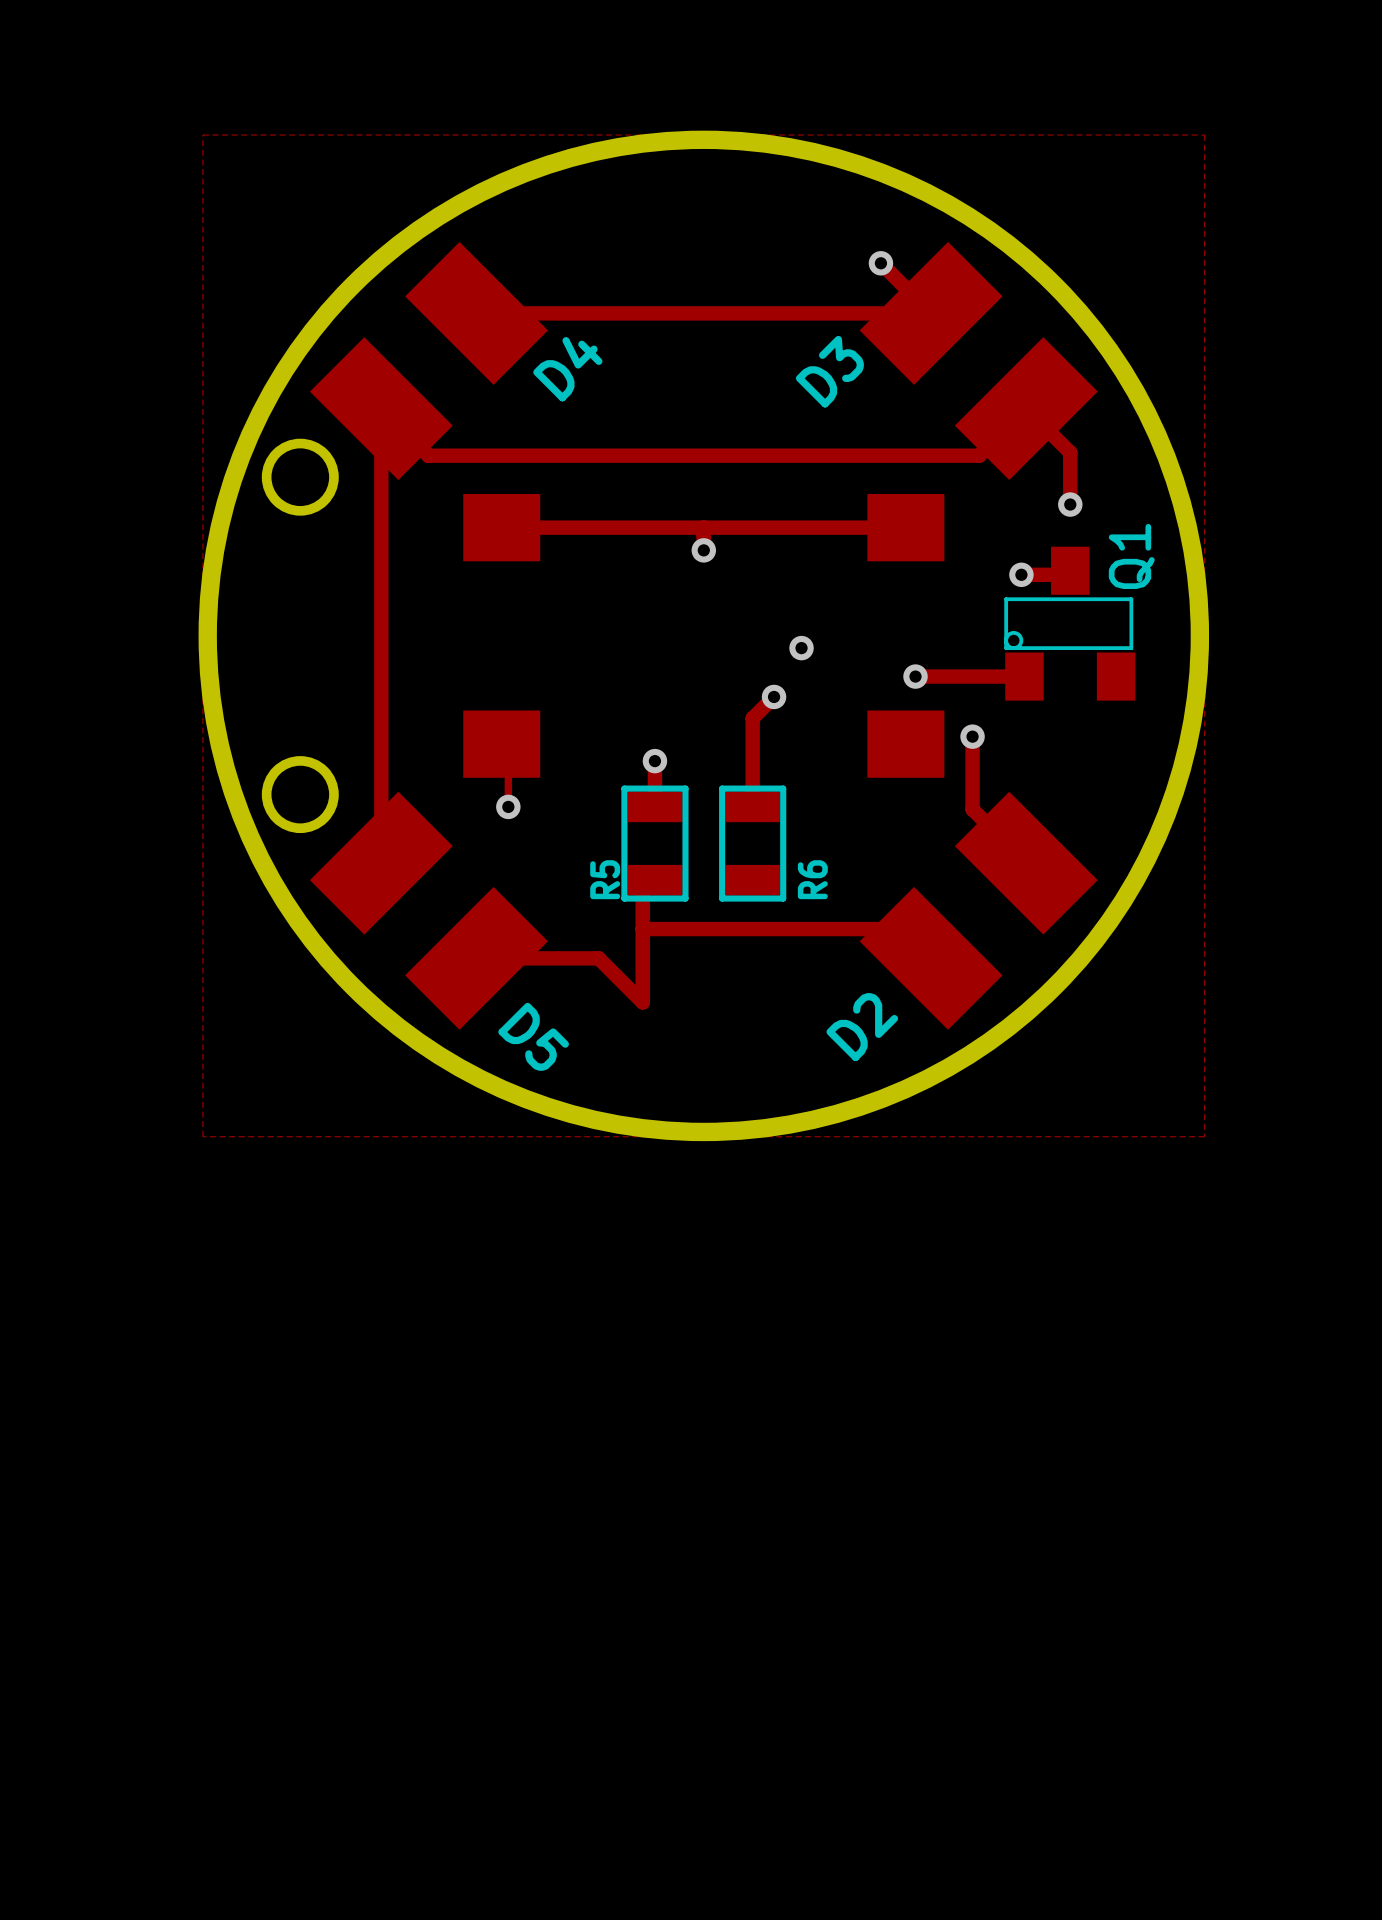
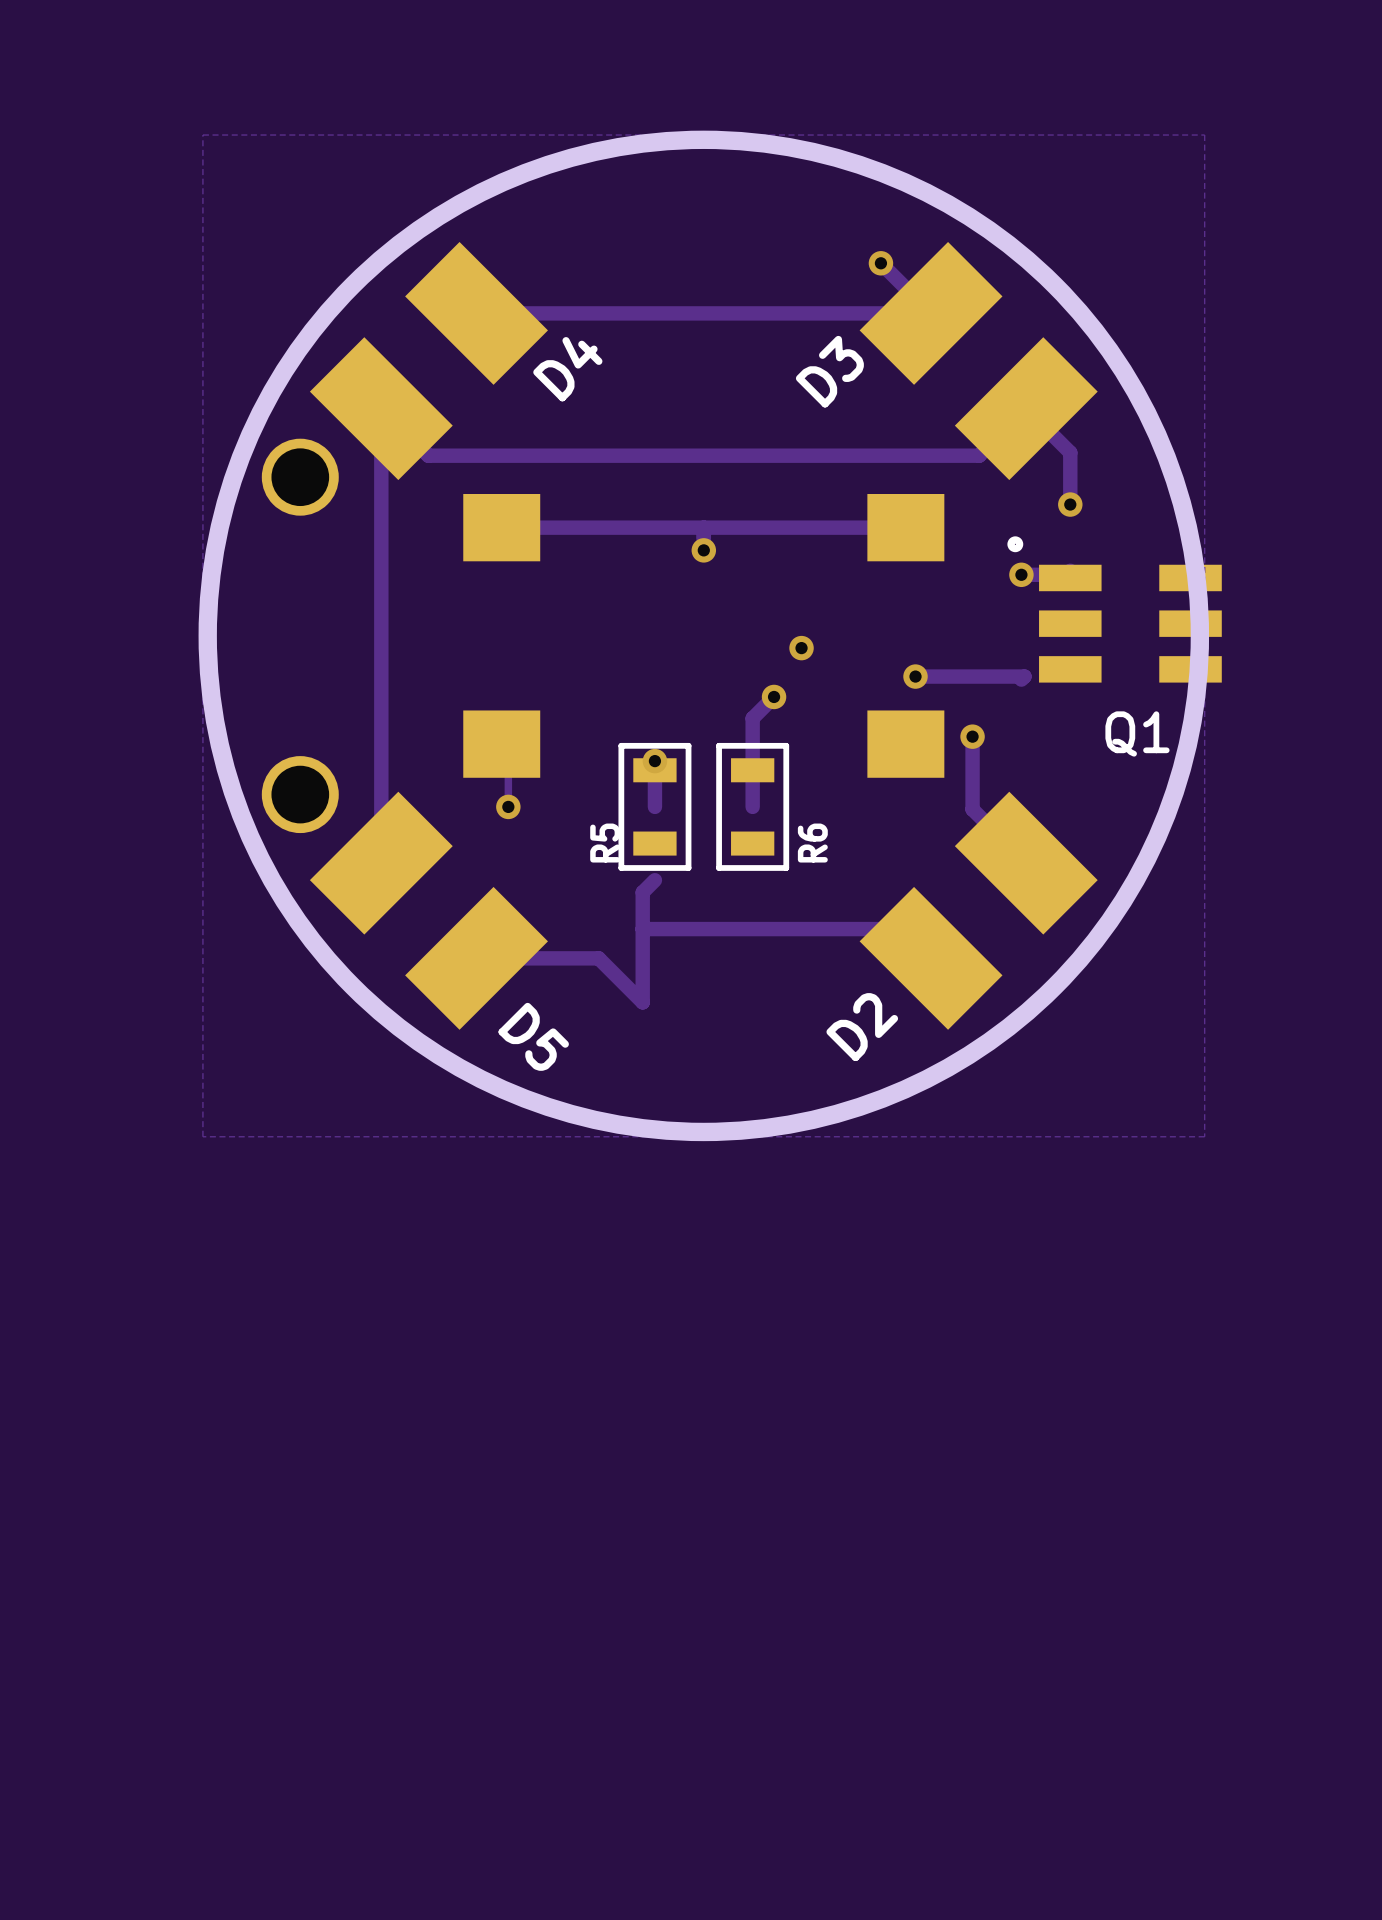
Q1 footprint: [1004, 546, 1136, 701] -> [1007, 536, 1222, 683]
Q1 name position: Q1 (1131, 556) -> Q1 (1137, 733)
R5 footprint: [621, 785, 689, 902] -> [618, 742, 692, 871]
R6 footprint: [719, 785, 787, 902] -> [716, 742, 790, 871]
R5 name position: R5 (605, 879) -> R5 (605, 843)
R6 name position: R6 (812, 879) -> R6 (812, 843)

